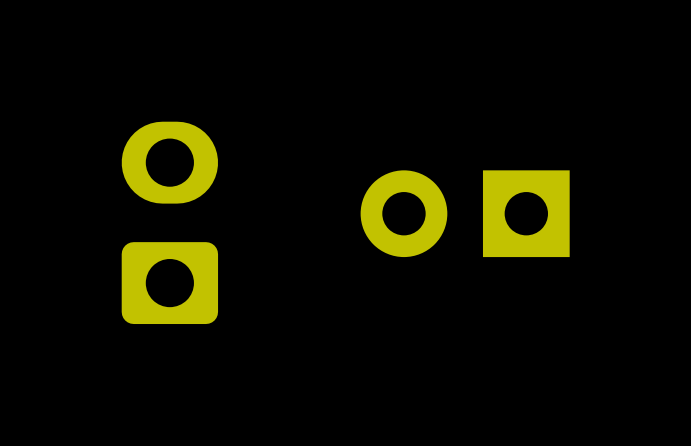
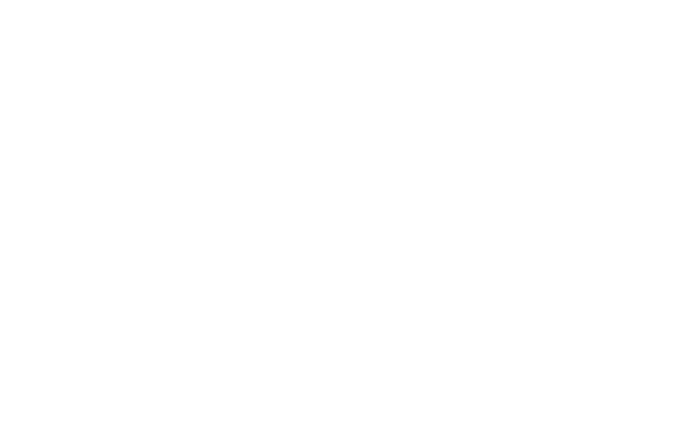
part: (465, 213) -> none
part: (169, 222) -> none

